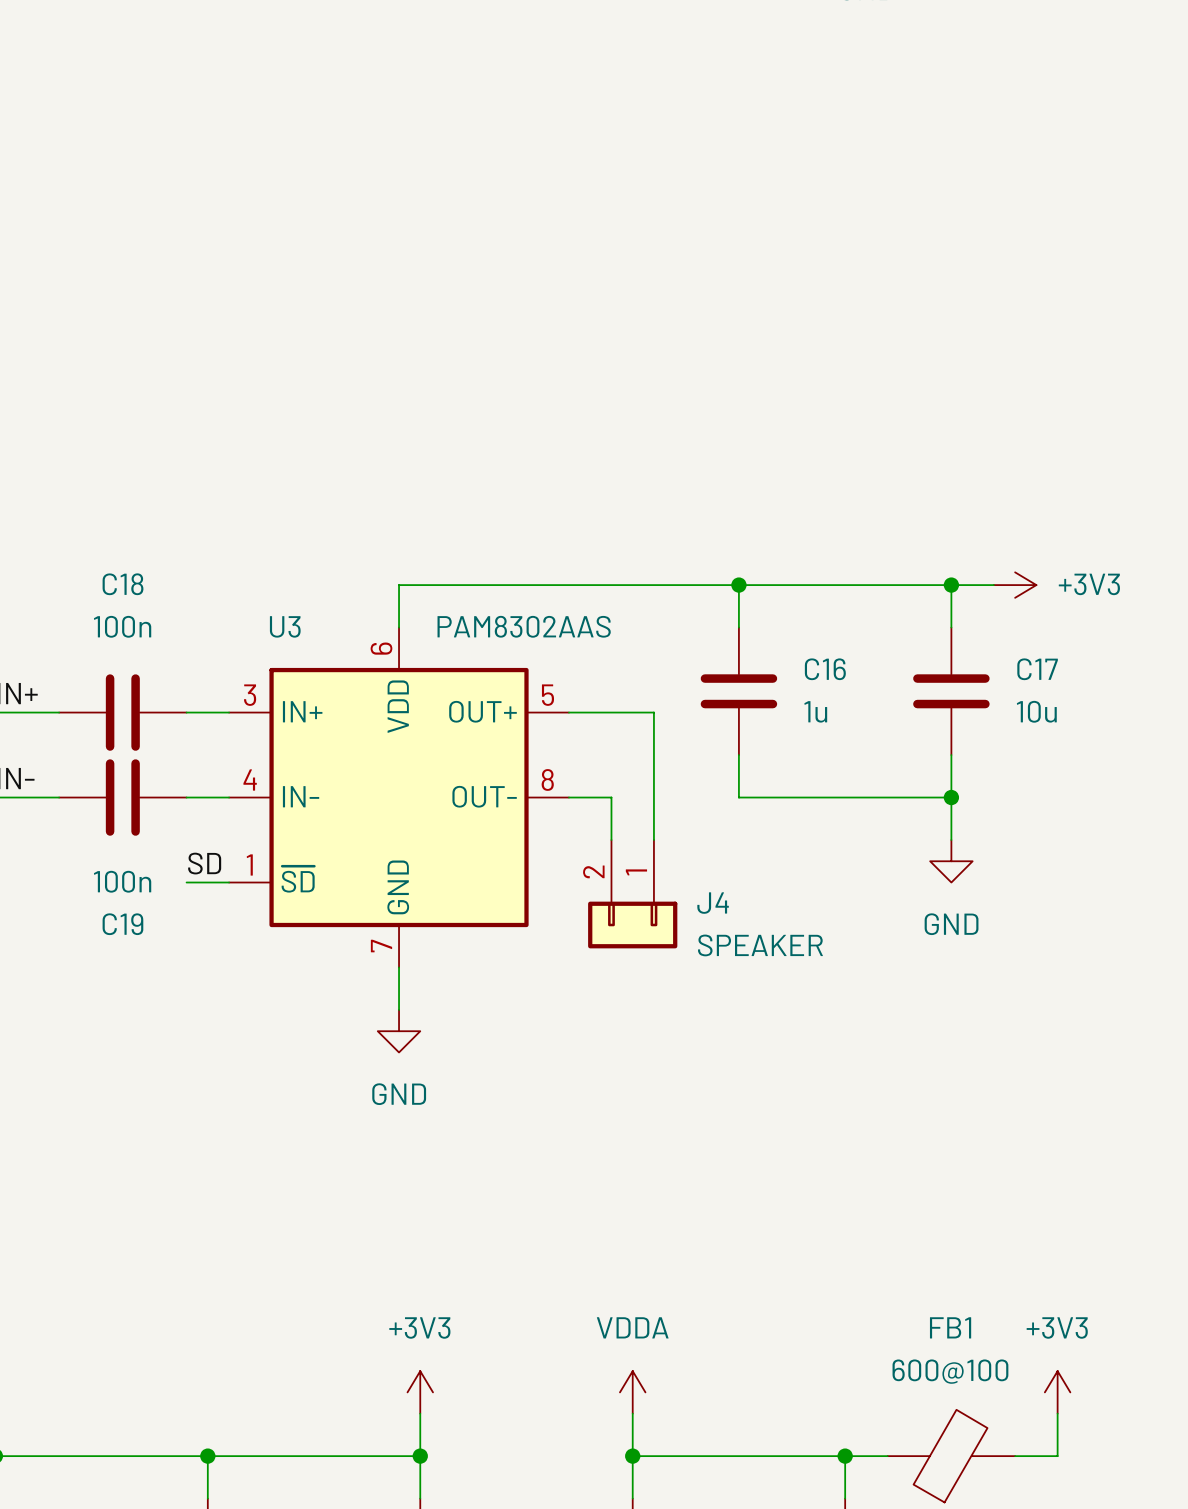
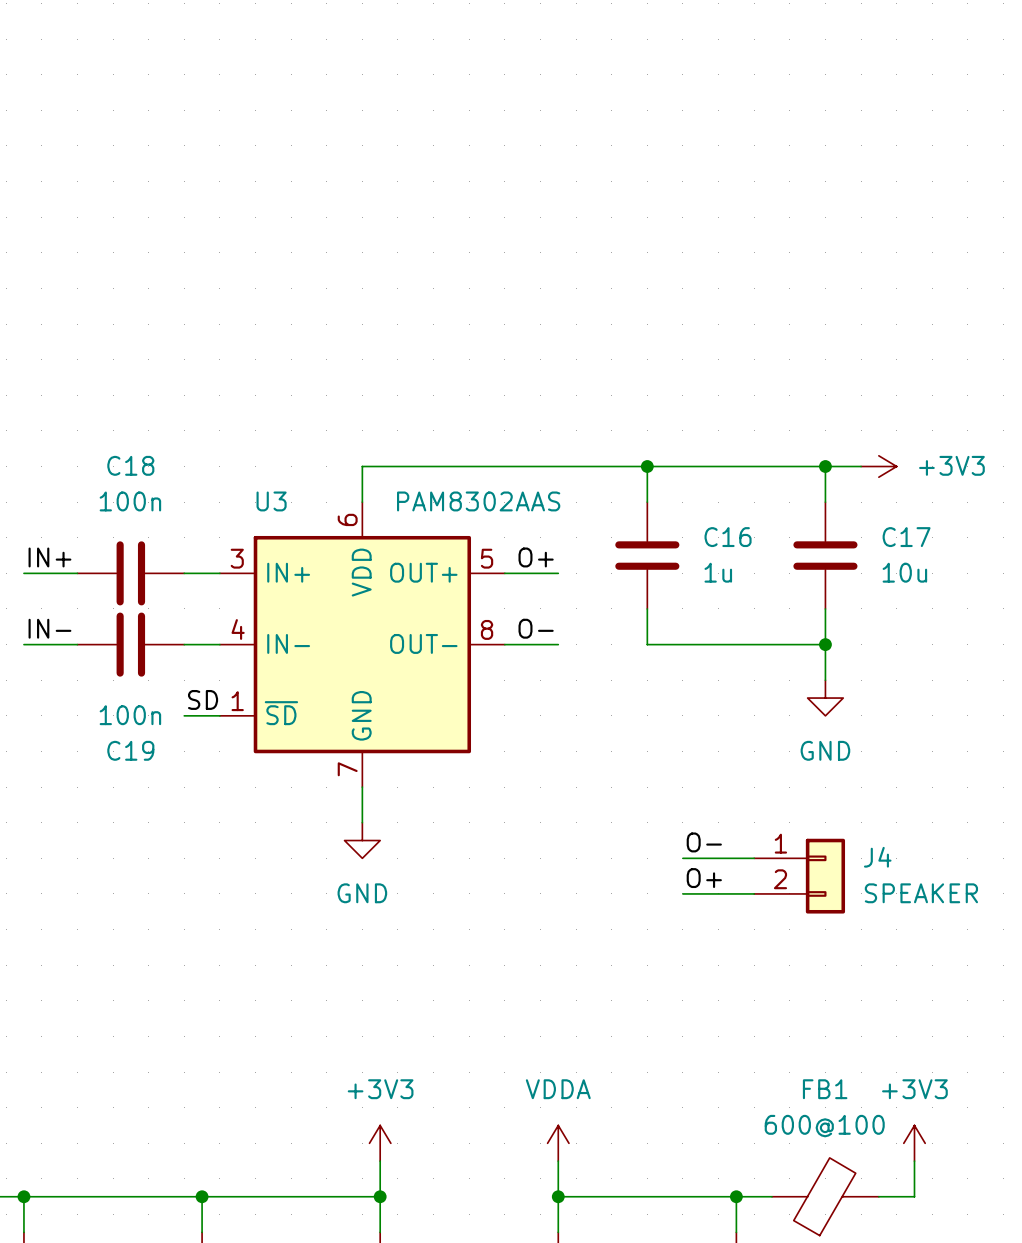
label: none -> O+ (536, 557)
wire: (632, 712) (653, 712) (653, 840) -> none
label: none -> O- (536, 628)
wire: (611, 797) (611, 840) -> (540, 644) (558, 644)
J4 position: (632, 894) -> (799, 876)
J4 rotation: 0° (632, 925) -> 90° counterclockwise (825, 876)
label: none -> O- (704, 842)
wire: none -> (682, 858) (754, 858)
label: none -> O+ (704, 878)
wire: none -> (682, 893) (754, 893)

